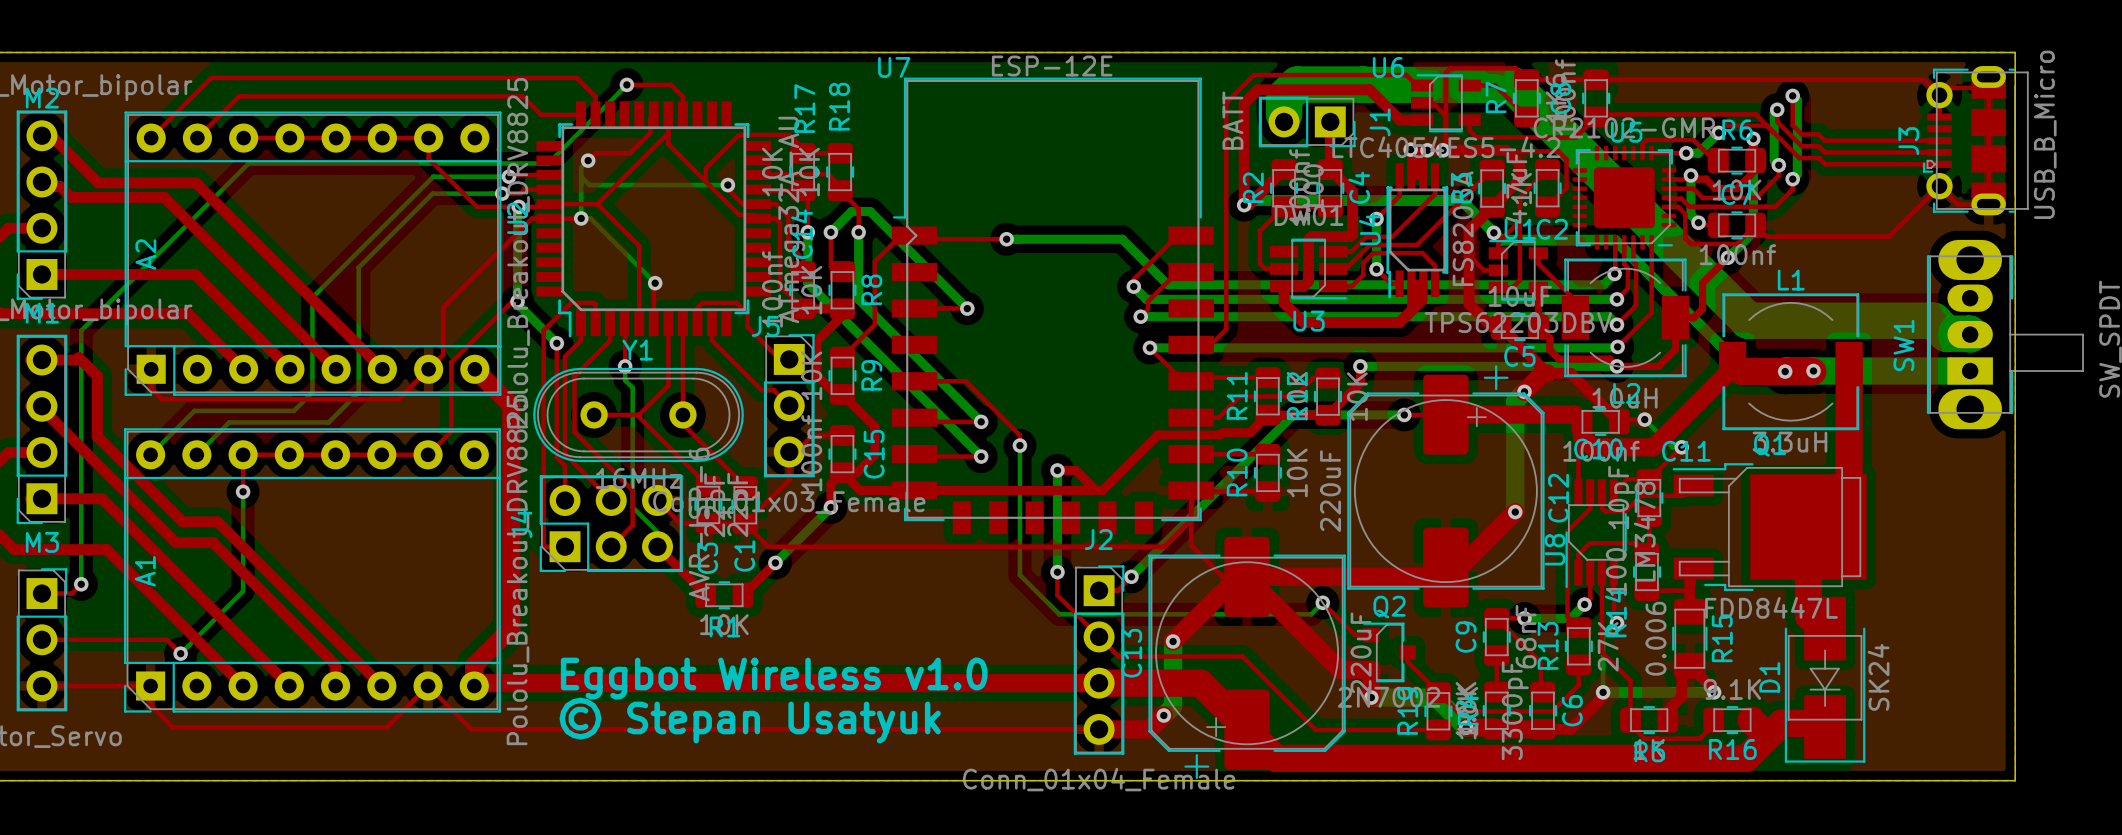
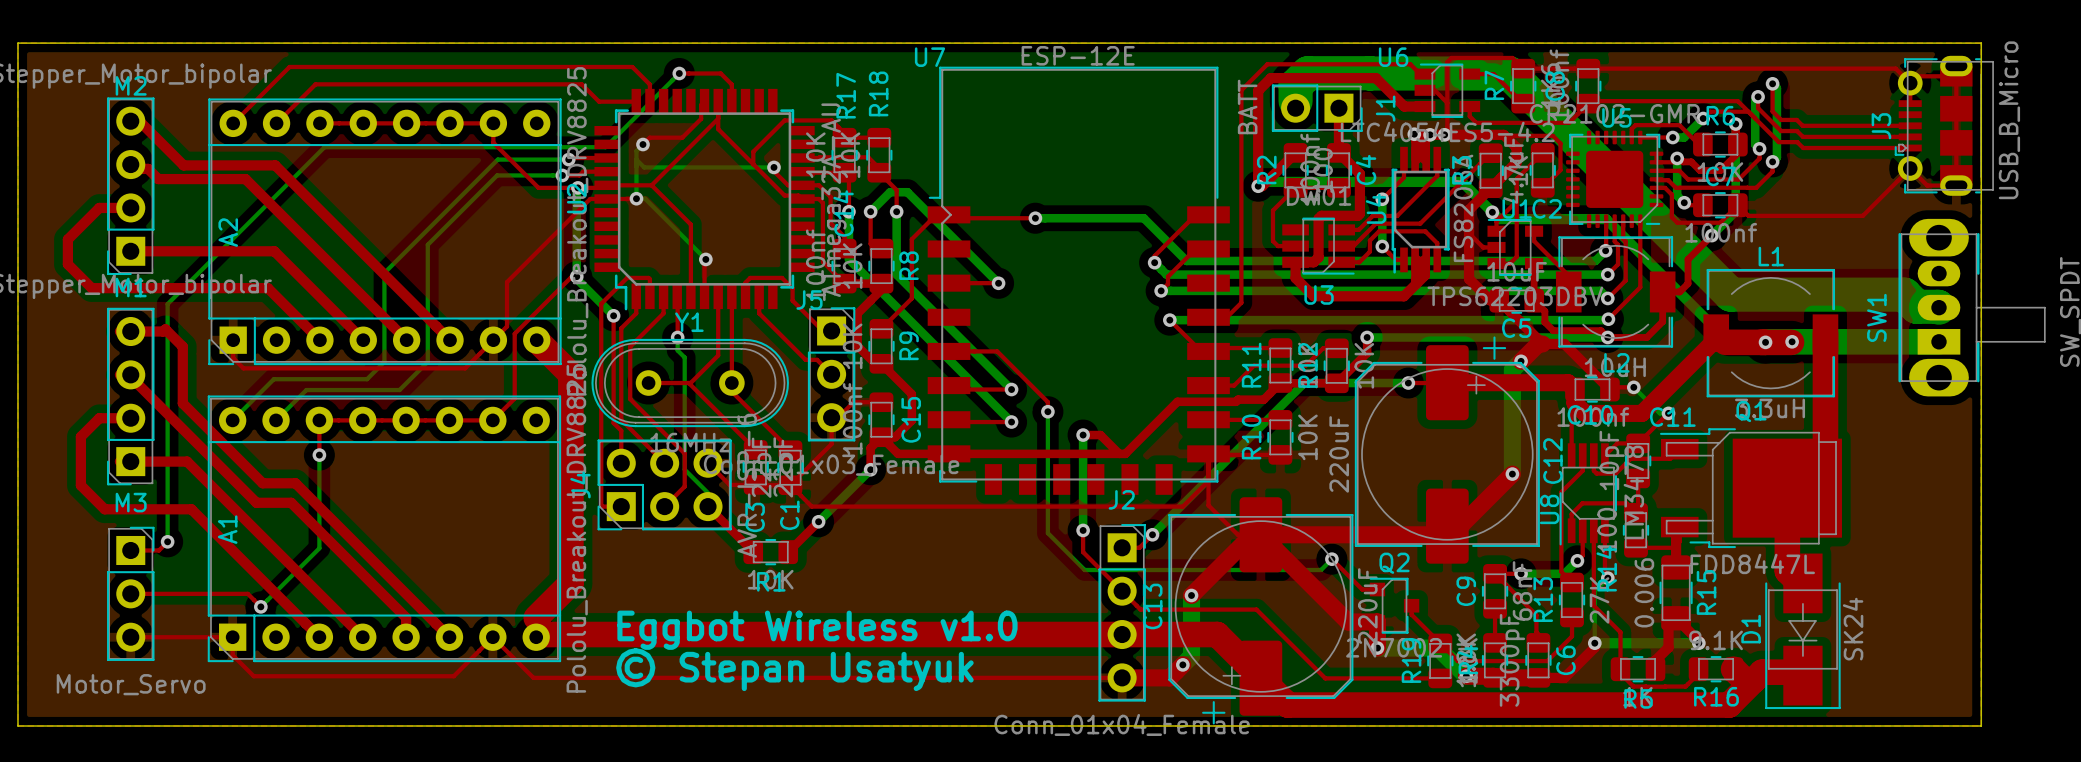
top track width: thin (474, 369) (511, 405) (511, 628) (474, 665) -> thick (536, 340) (570, 374) (570, 583) (536, 617)
top track width: thin (477, 683) (1099, 683) -> thick (538, 634) (1122, 634)

